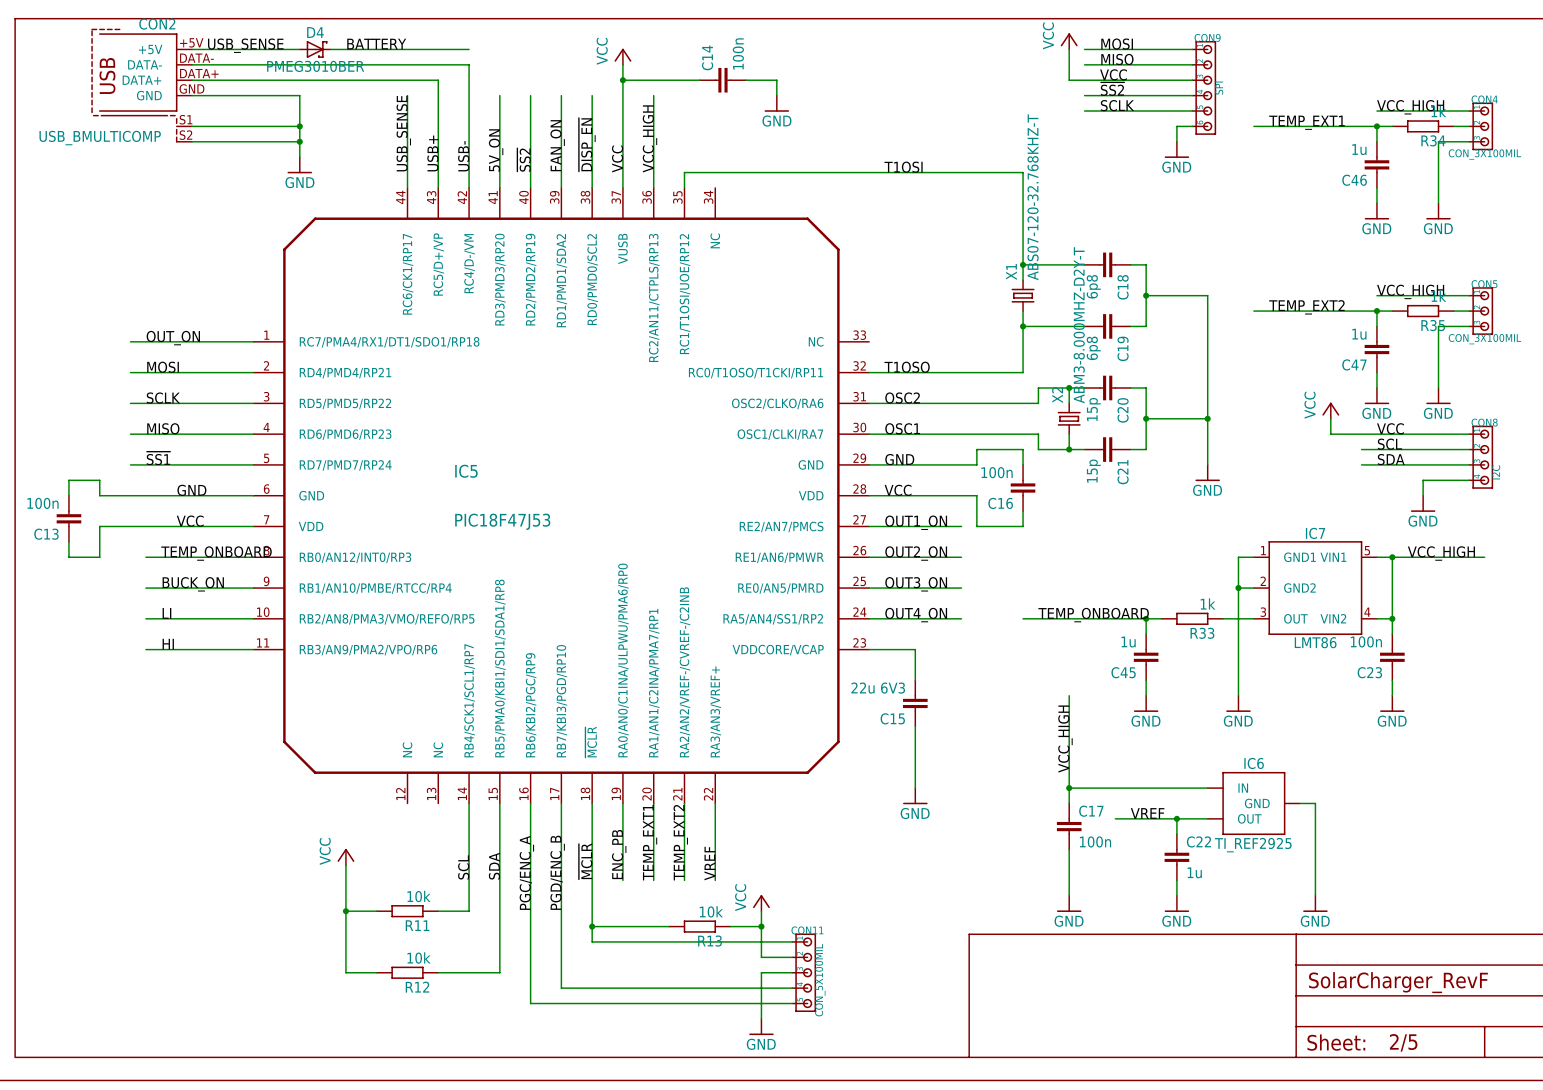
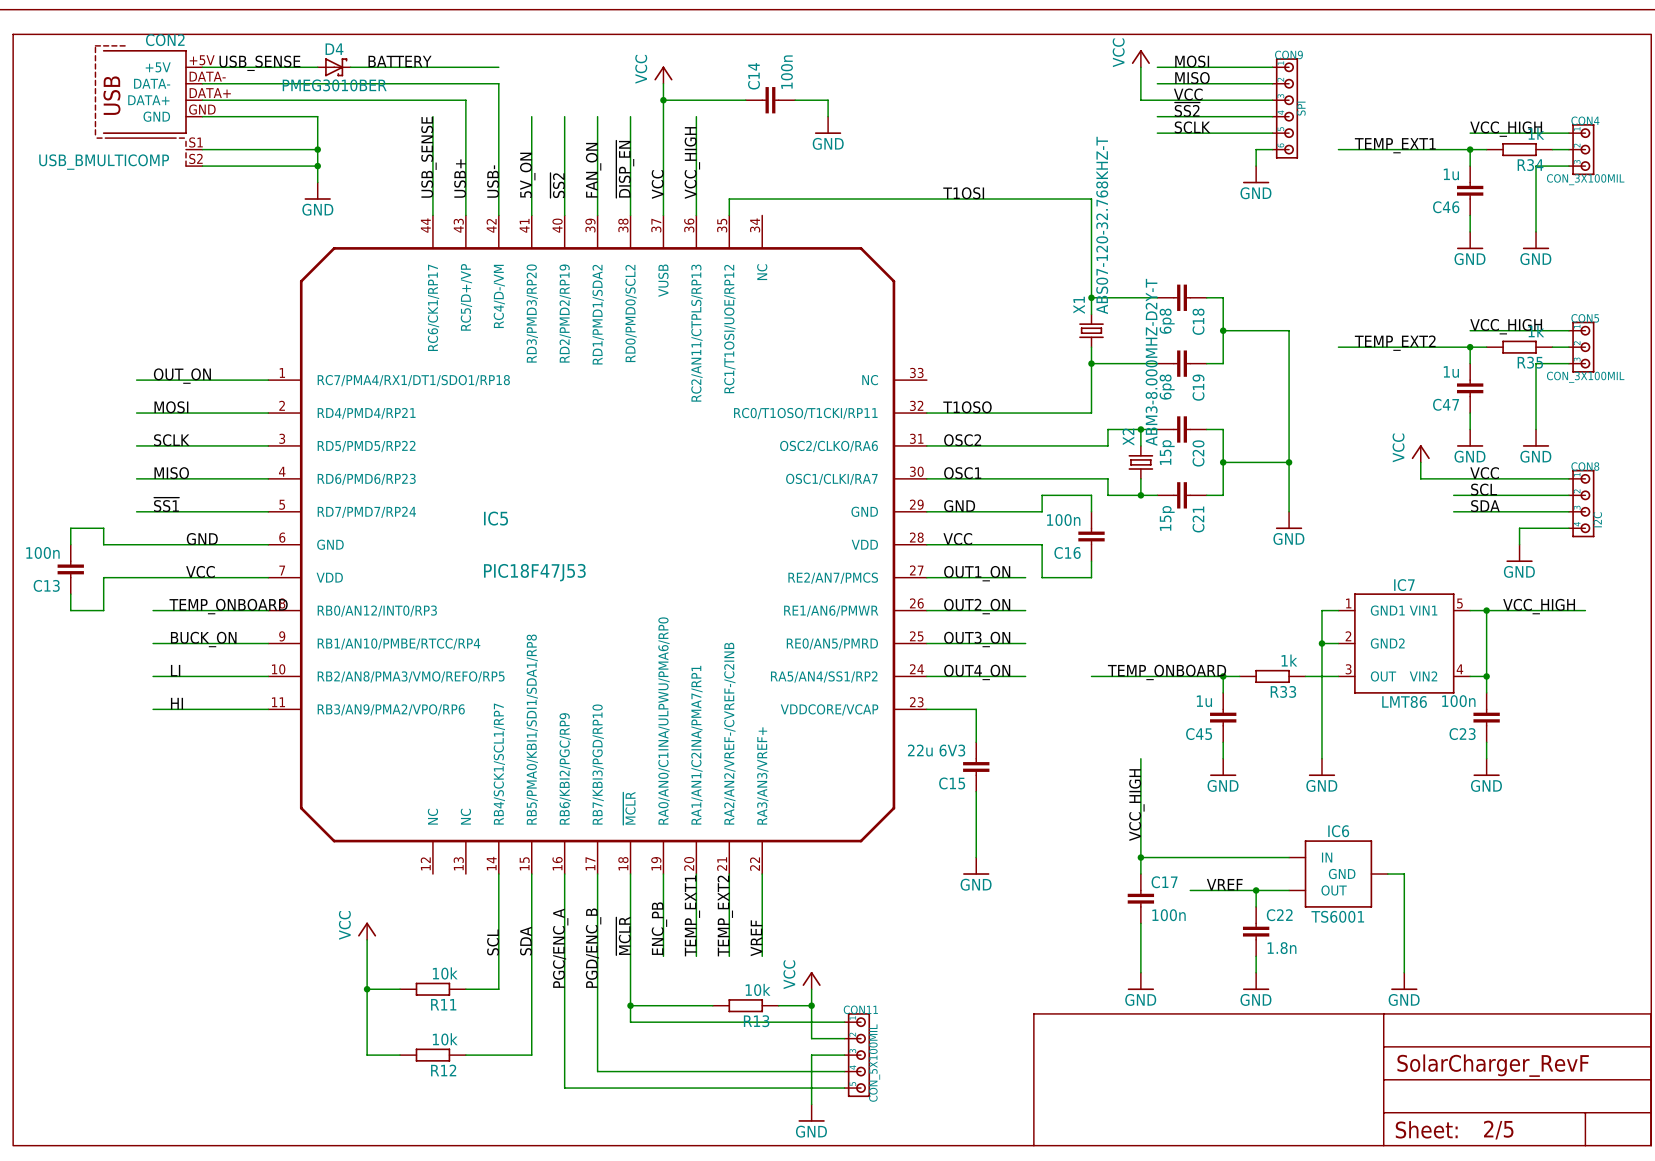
IC6 value: TI_REF2925 (1253, 845) -> TS6001 (1337, 916)
C22 value: 1u (1194, 872) -> 1.8n (1282, 948)

